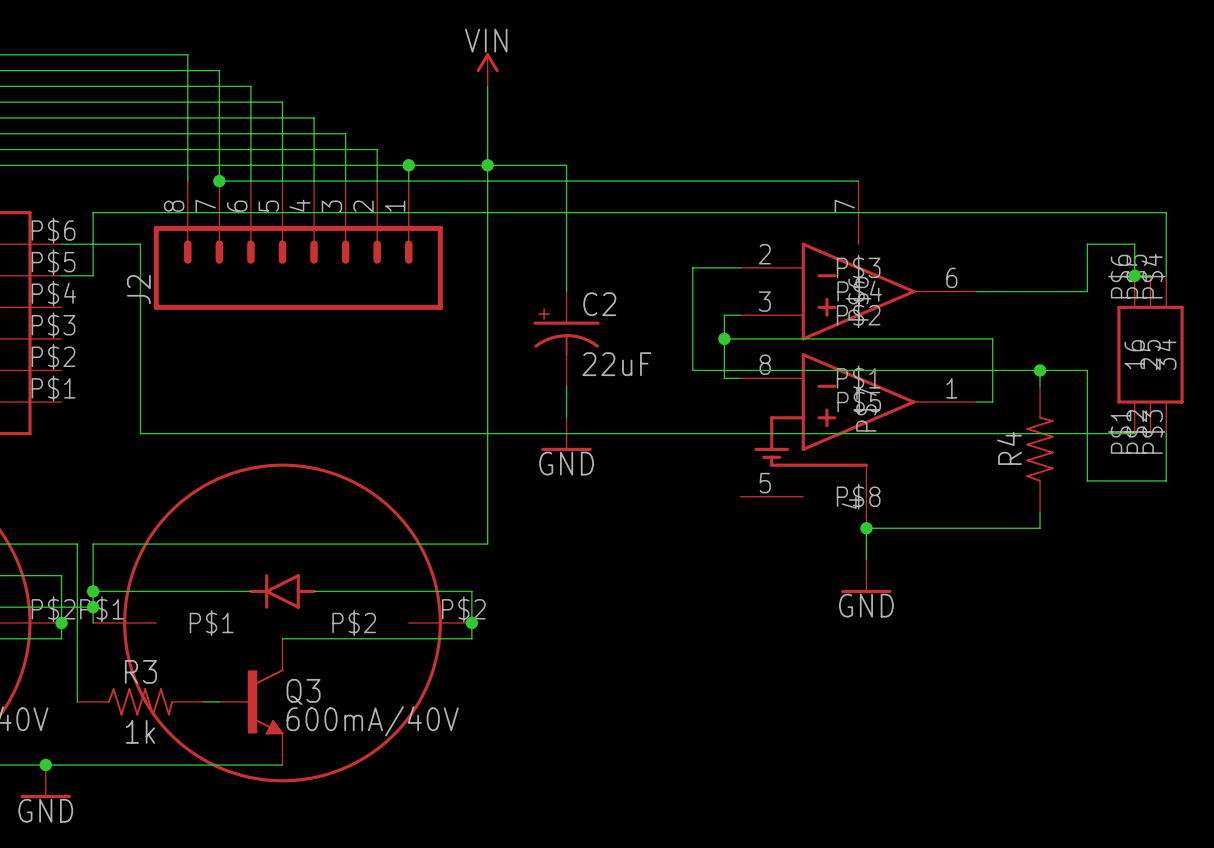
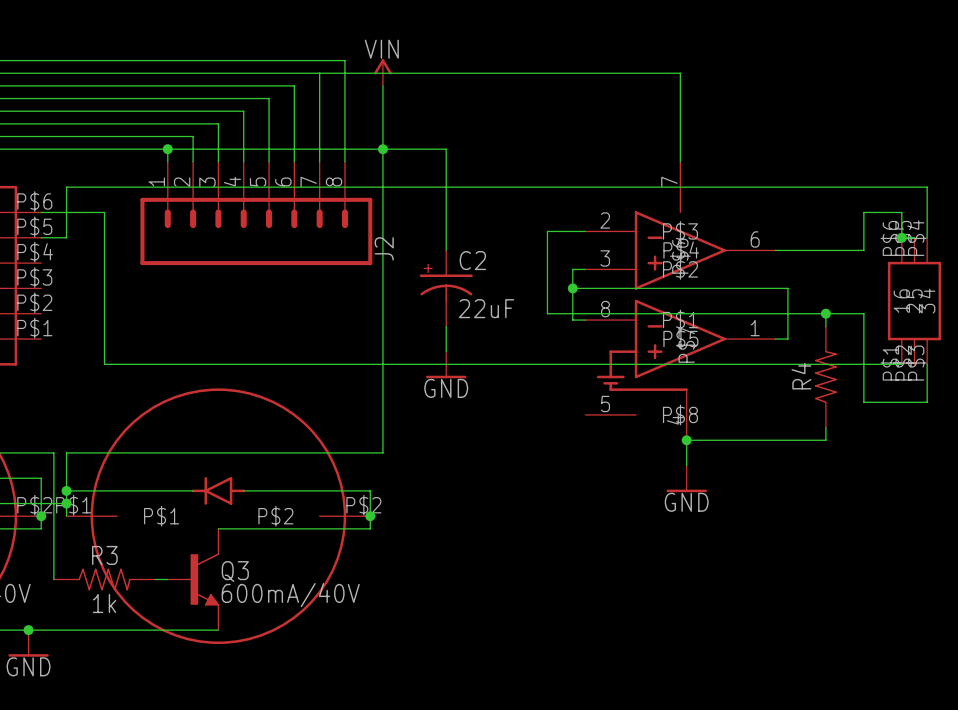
wire: (187, 54) (187, 181) -> (142, 60) (344, 60) (344, 161)
wire: (219, 70) (219, 165) -> (319, 73) (319, 149)
wire: (250, 86) (250, 149) (377, 149) -> (193, 85) (294, 85) (294, 136)
wire: (282, 102) (282, 133) (345, 133) -> (218, 98) (269, 98) (269, 123)
junction: (408, 165) -> none
wire: (219, 181) (858, 181) -> (167, 73) (680, 73) (680, 161)
junction position: (219, 181) -> (167, 149)
J2 flip: as is (298, 267) -> left-right (256, 231)

